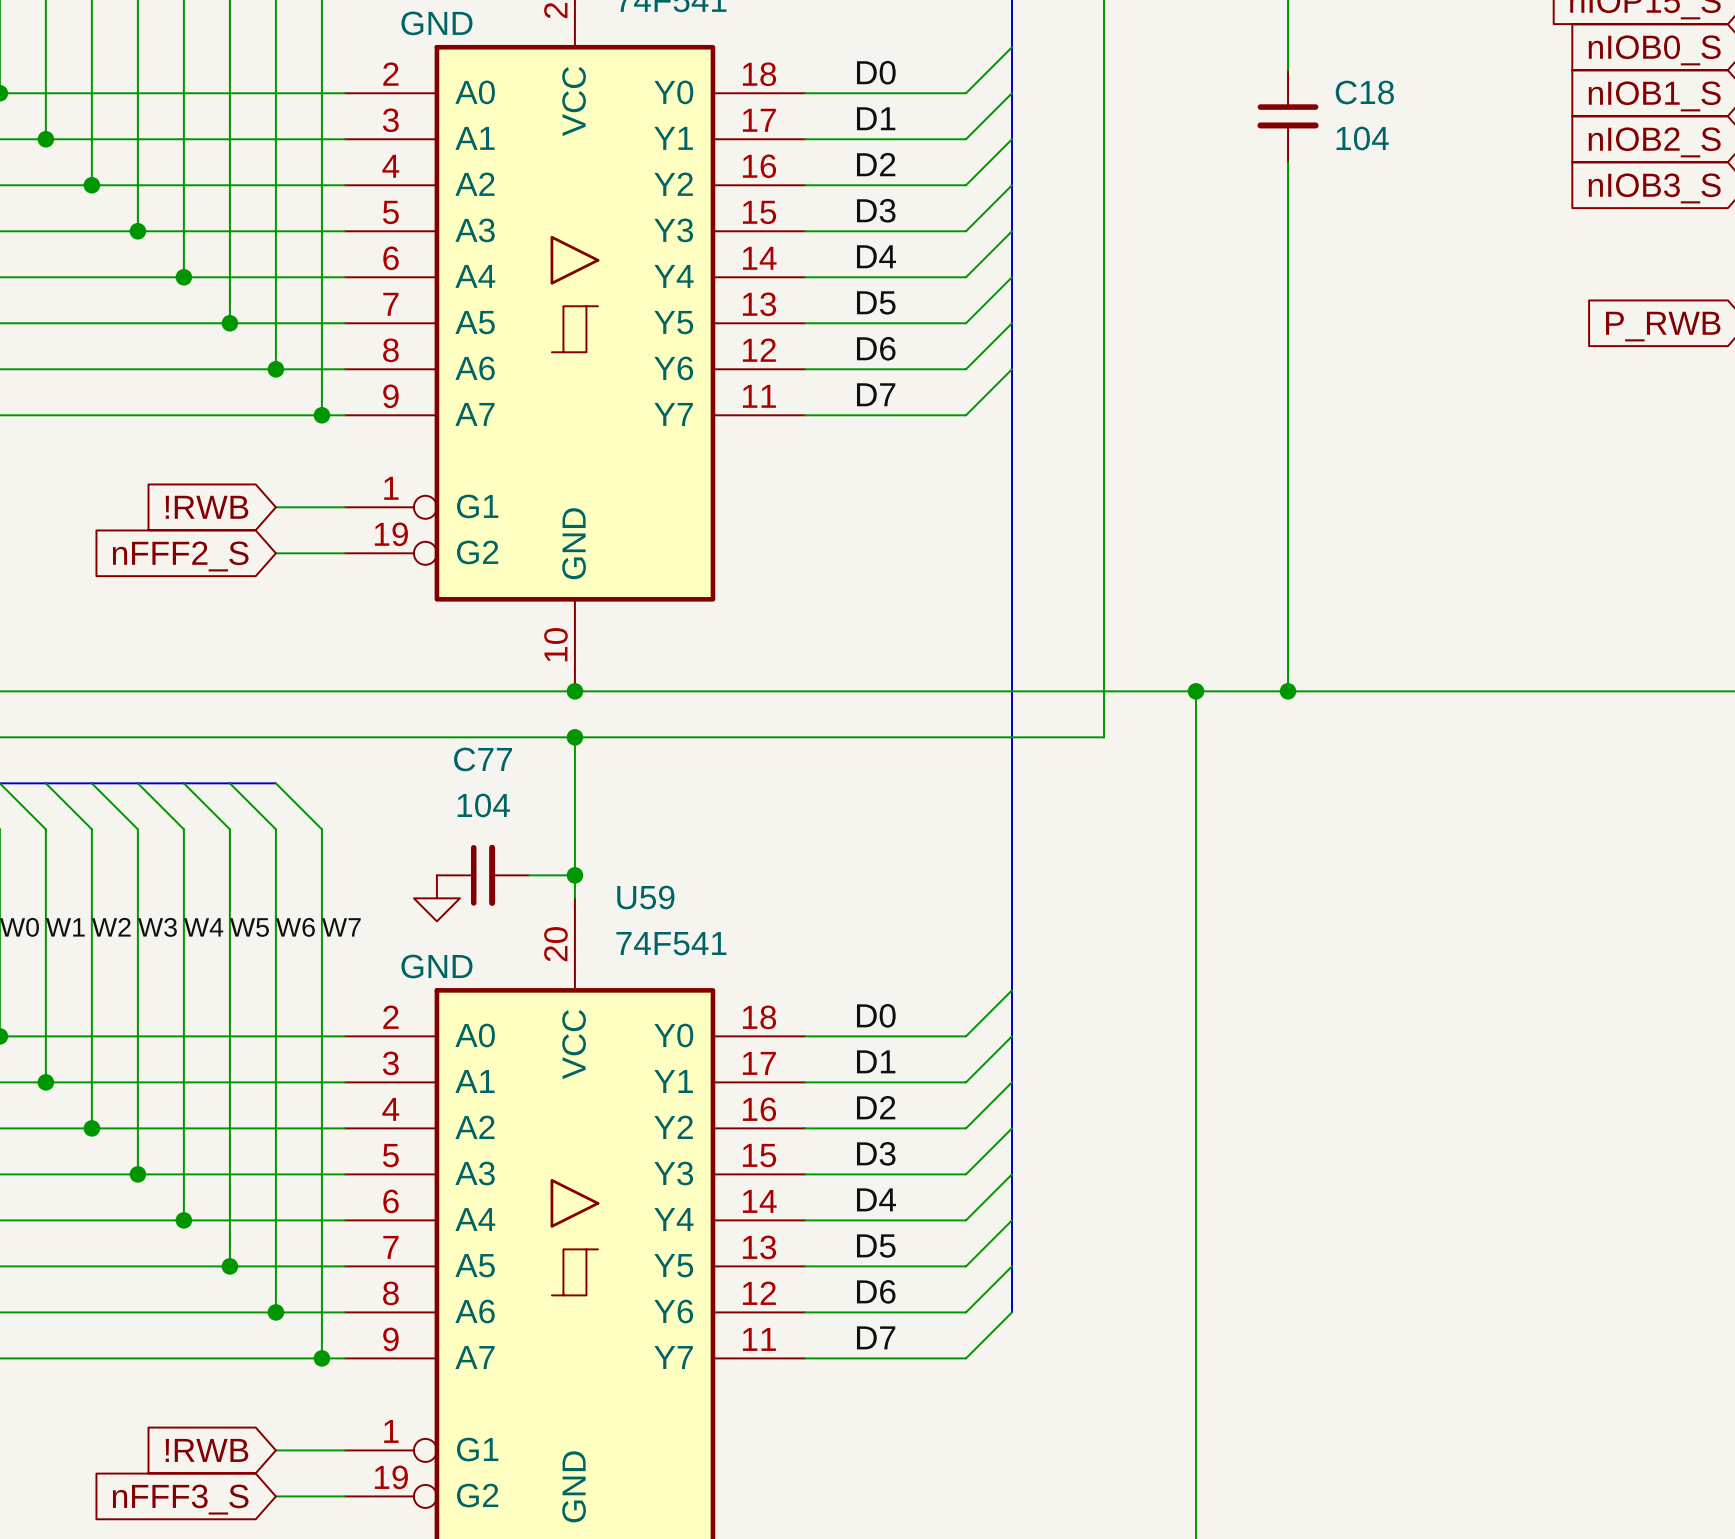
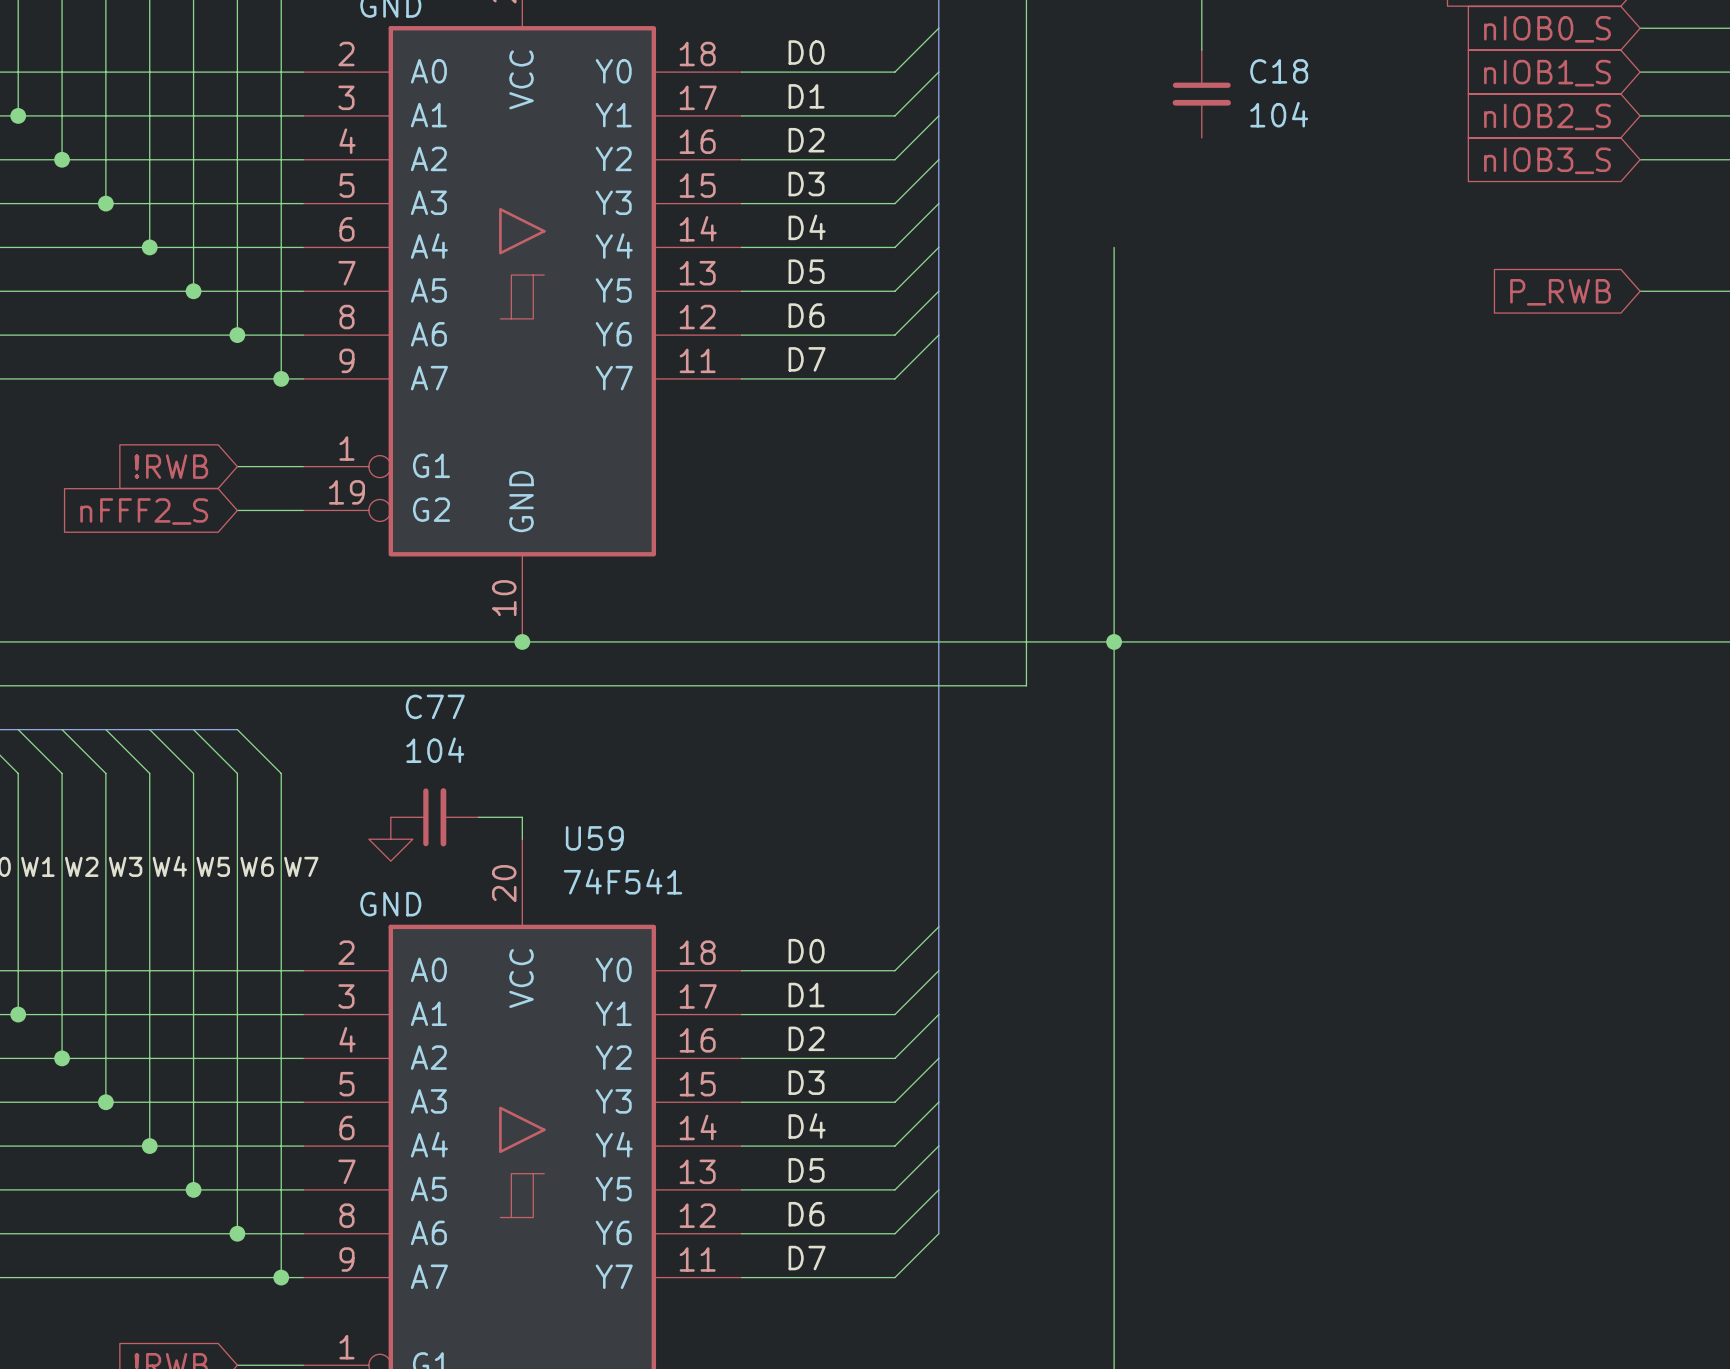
wire: (1288, 162) (1288, 691) -> none
wire: none -> (1114, 247) (1114, 641)
junction: (1288, 691) -> none
wire: (574, 737) (574, 875) -> none
junction: (574, 737) -> none
junction: (574, 875) -> none

